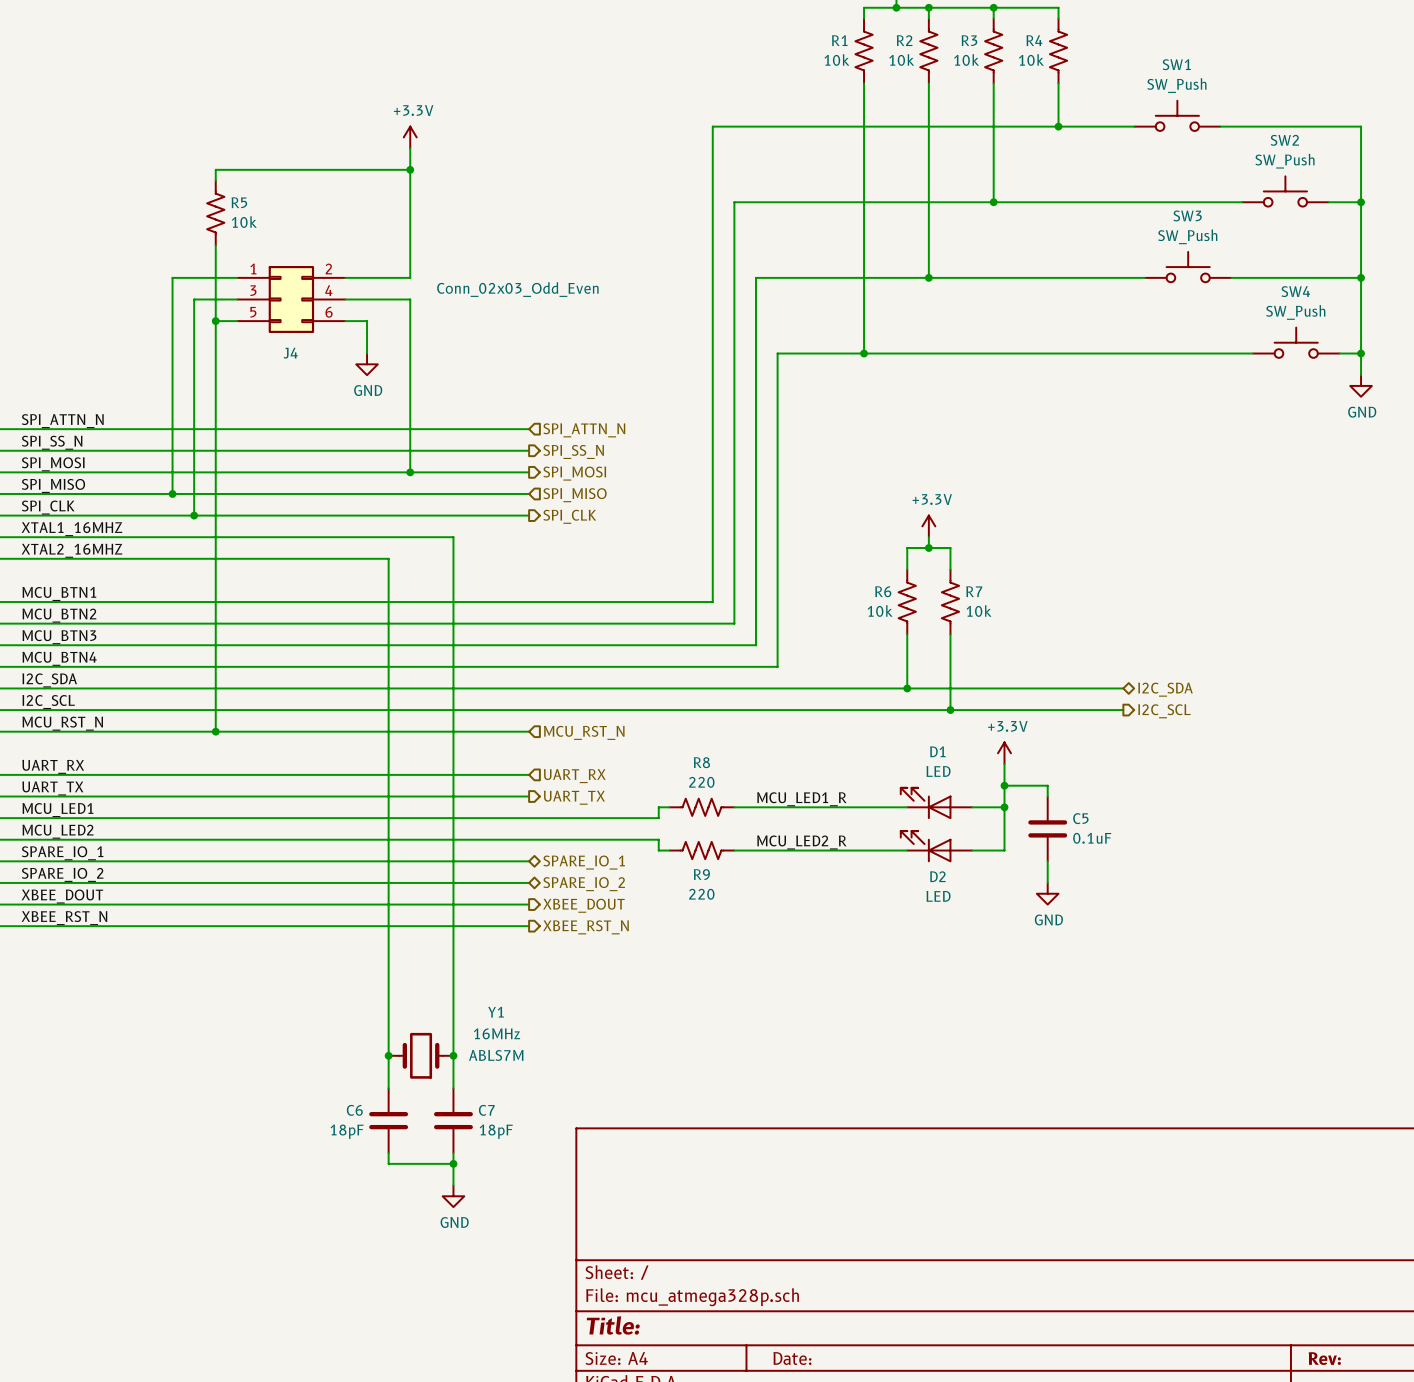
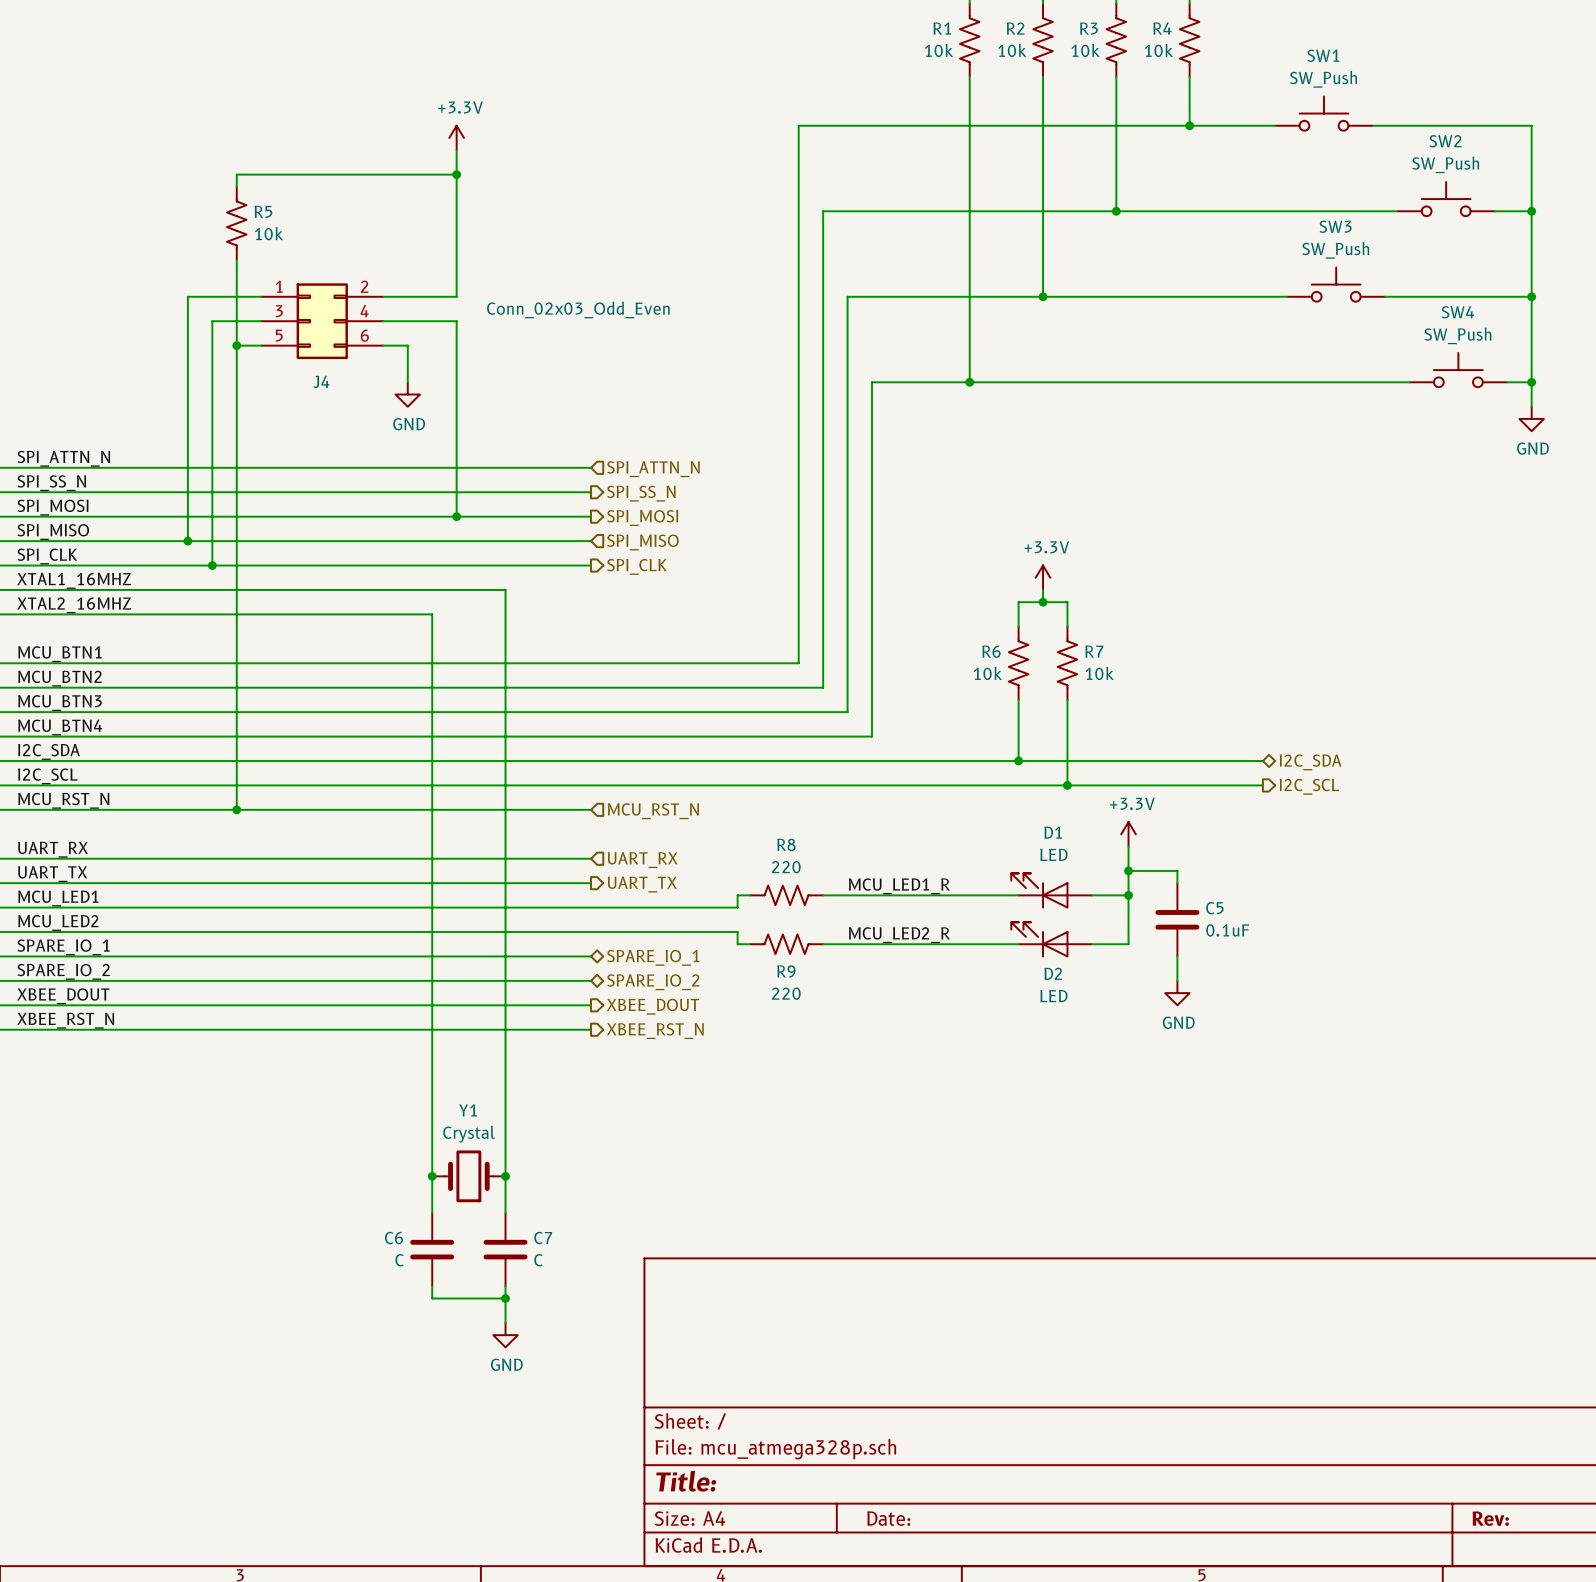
Y1 name position: Y1 (496, 1012) -> Y1 (468, 1110)
Y1 value: 16MHz (497, 1033) -> Crystal (469, 1134)
Y1 text: ABLS7M (496, 1055) -> none
C6 value: 18pF (347, 1131) -> C (399, 1260)
C7 value: 18pF (496, 1131) -> C (538, 1260)

